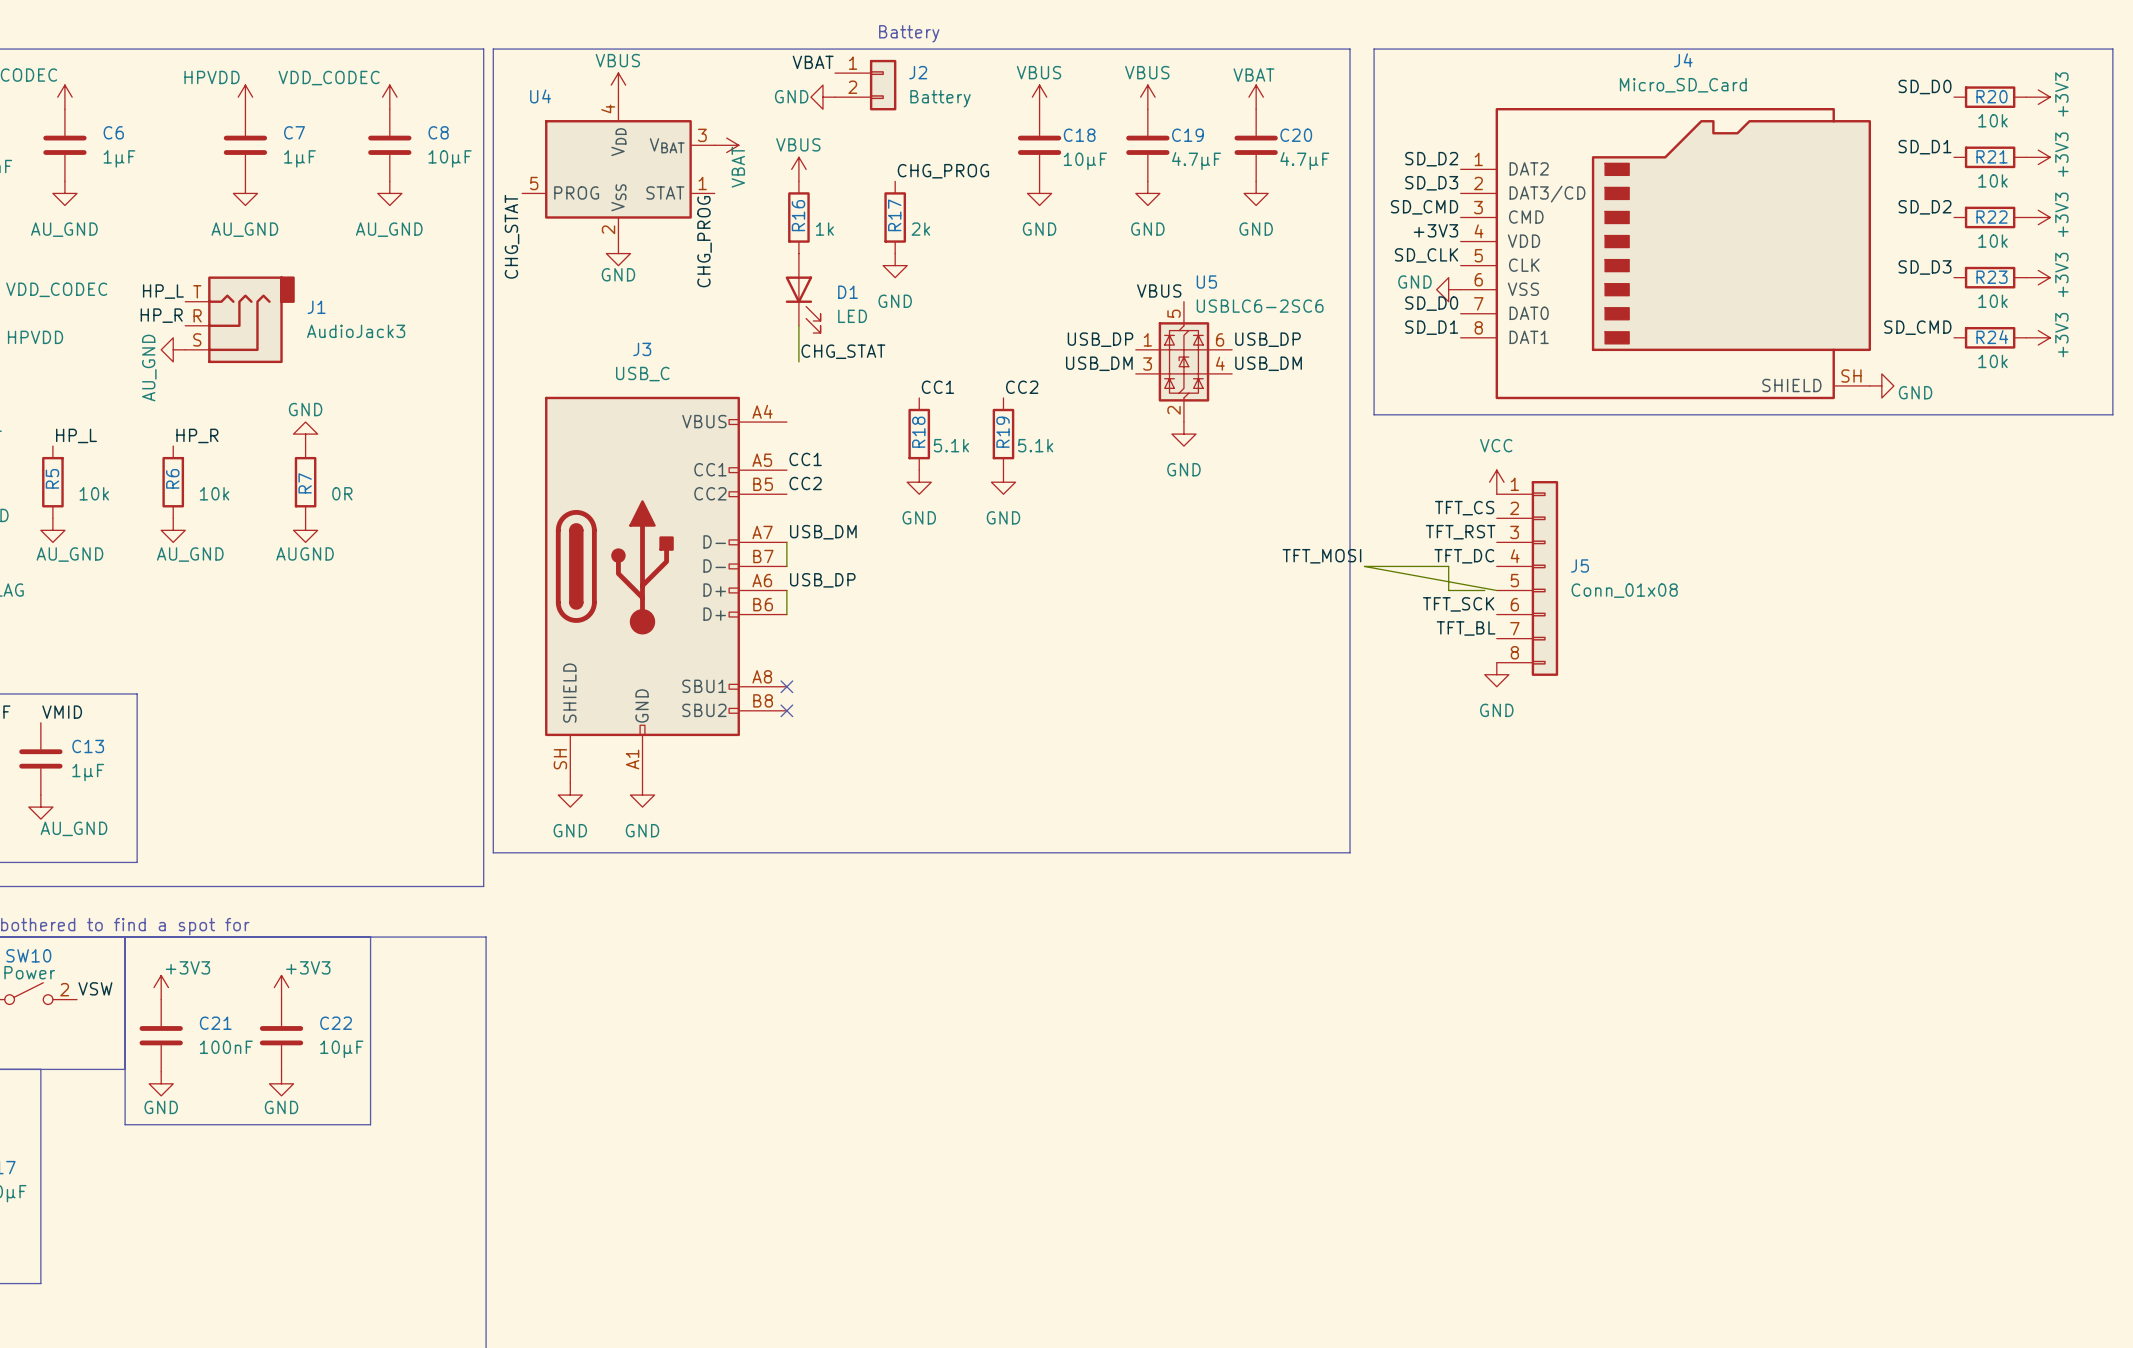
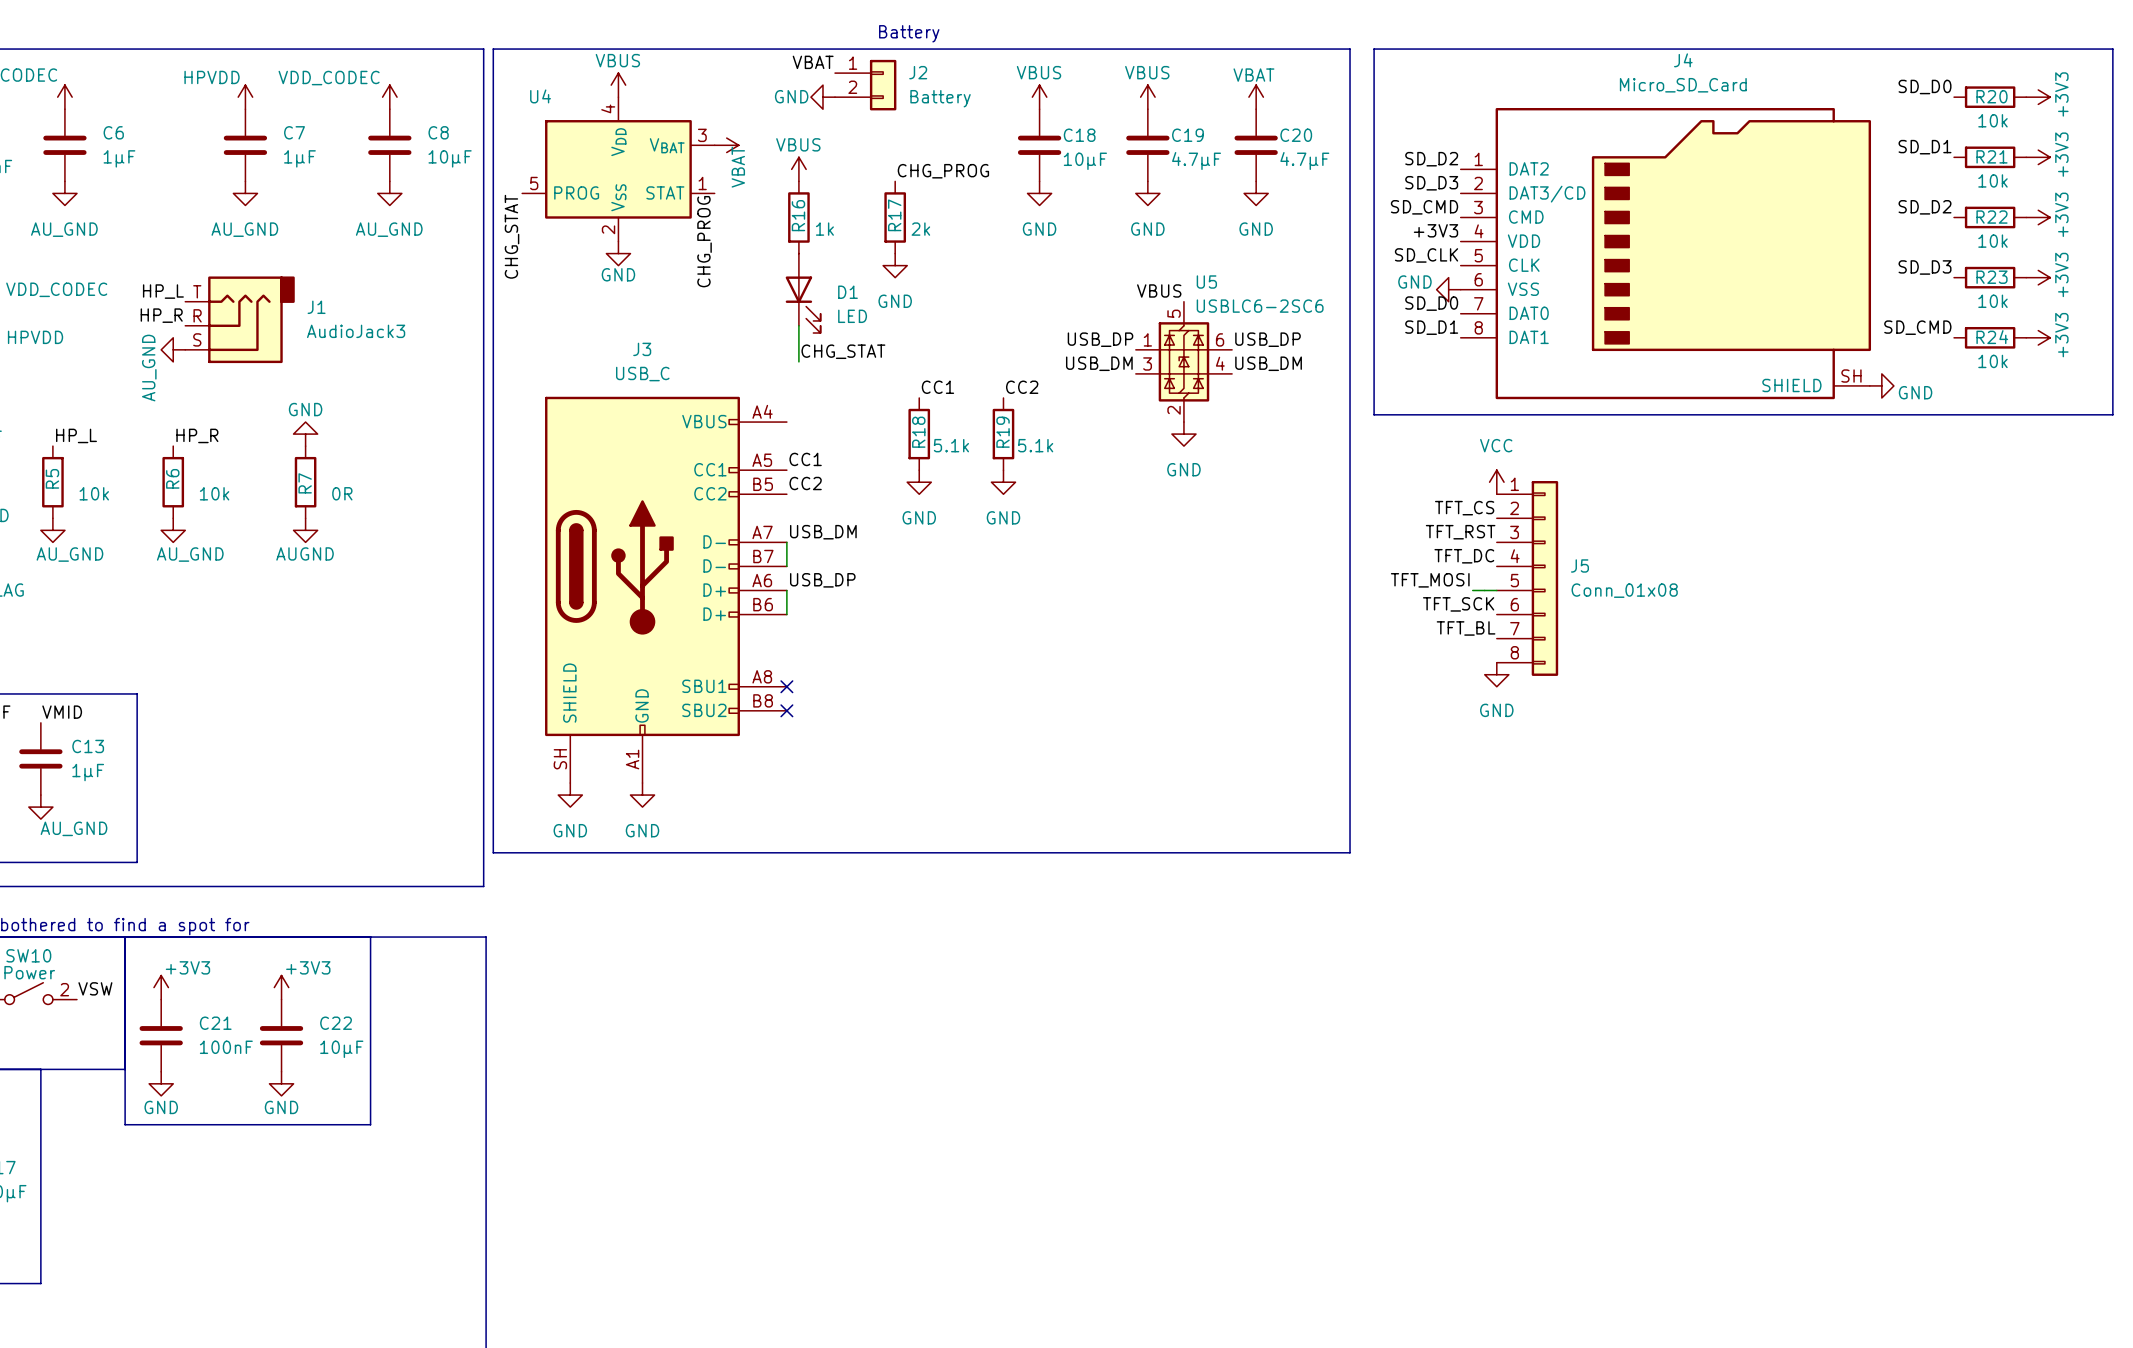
label position: TFT_MOSI (1321, 556) -> TFT_MOSI (1430, 580)
wire: (1472, 590) (1448, 590) (1448, 566) (1364, 566) (1496, 590) -> (1484, 590) (1496, 590)

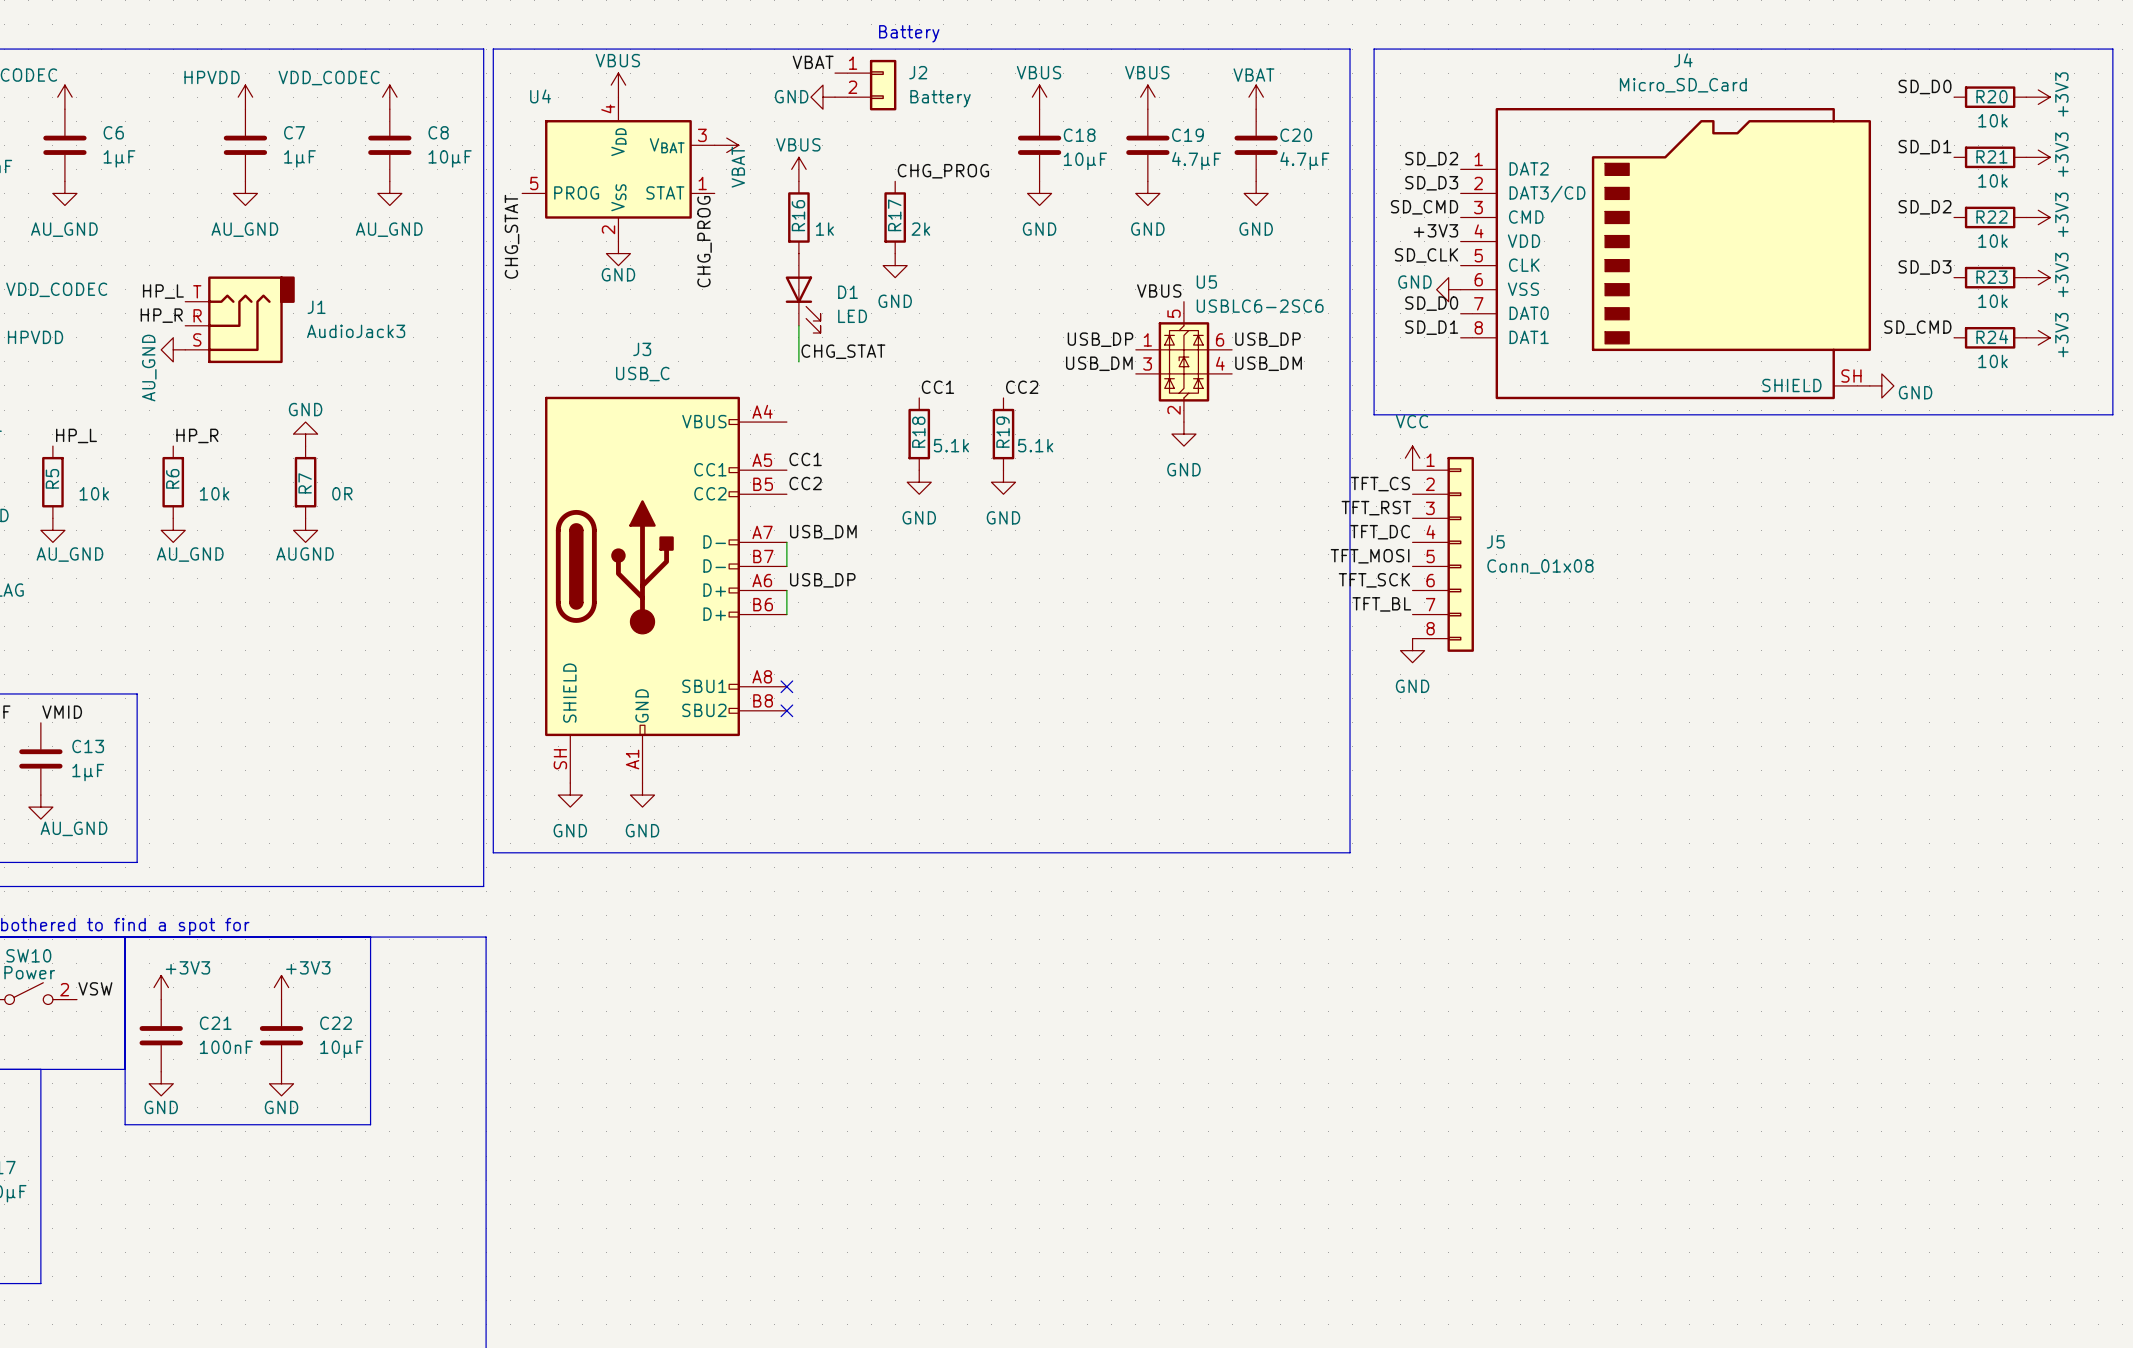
power symbol position: VCC (1496, 482) -> VCC (1412, 458)
label position: TFT_CS (1464, 508) -> TFT_CS (1380, 484)
label position: TFT_RST (1460, 532) -> TFT_RST (1376, 508)
label position: TFT_DC (1464, 556) -> TFT_DC (1380, 532)
J5 position: (1527, 578) -> (1443, 554)
label position: TFT_MOSI (1430, 580) -> TFT_MOSI (1370, 556)
wire: (1472, 590) (1496, 590) -> none
label position: TFT_SCK (1458, 604) -> TFT_SCK (1374, 580)
label position: TFT_BL (1466, 628) -> TFT_BL (1381, 604)
power symbol position: GND (1496, 674) -> GND (1412, 650)

